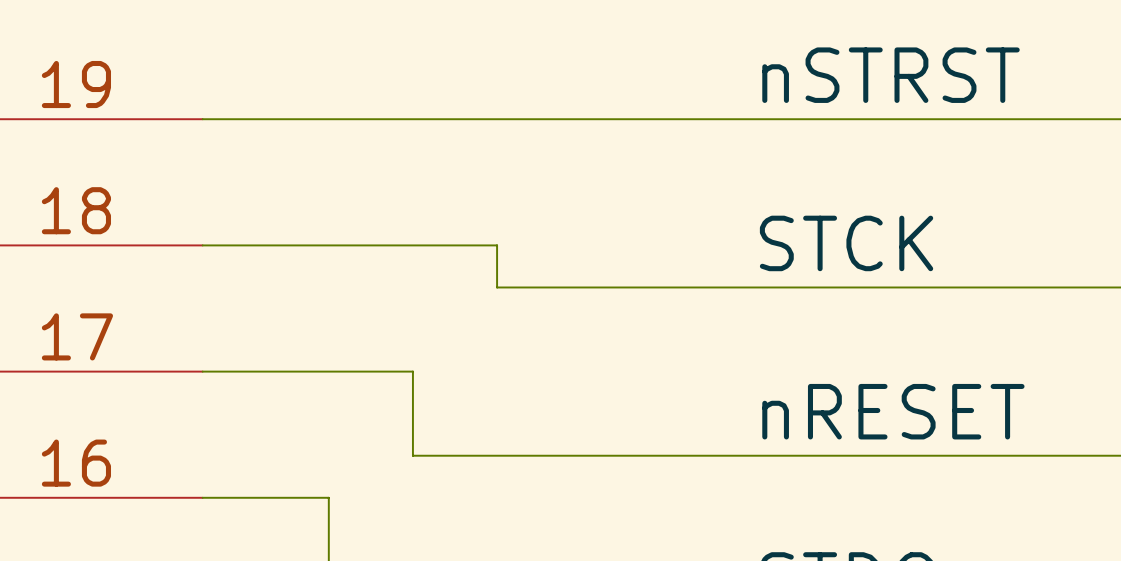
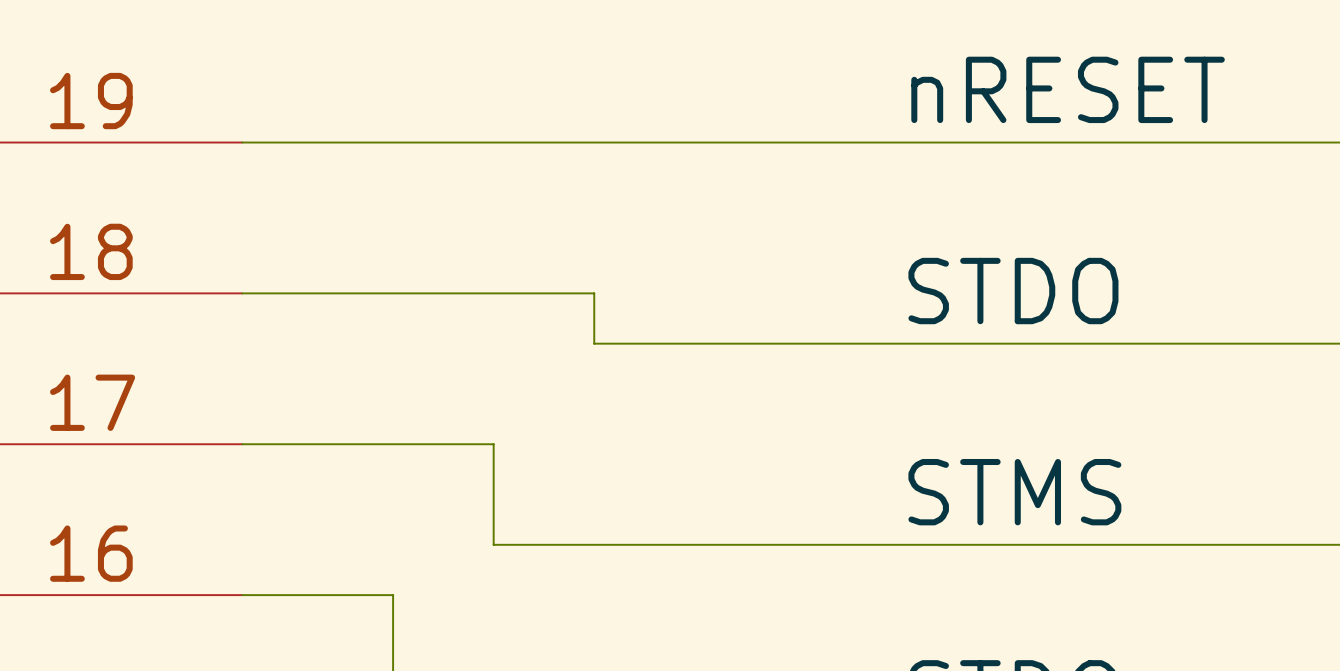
label: nSTRST (891, 75) -> nRESET (1068, 89)
label: STCK (846, 243) -> STDO (1013, 291)
label: nRESET (893, 411) -> STMS (1014, 492)

